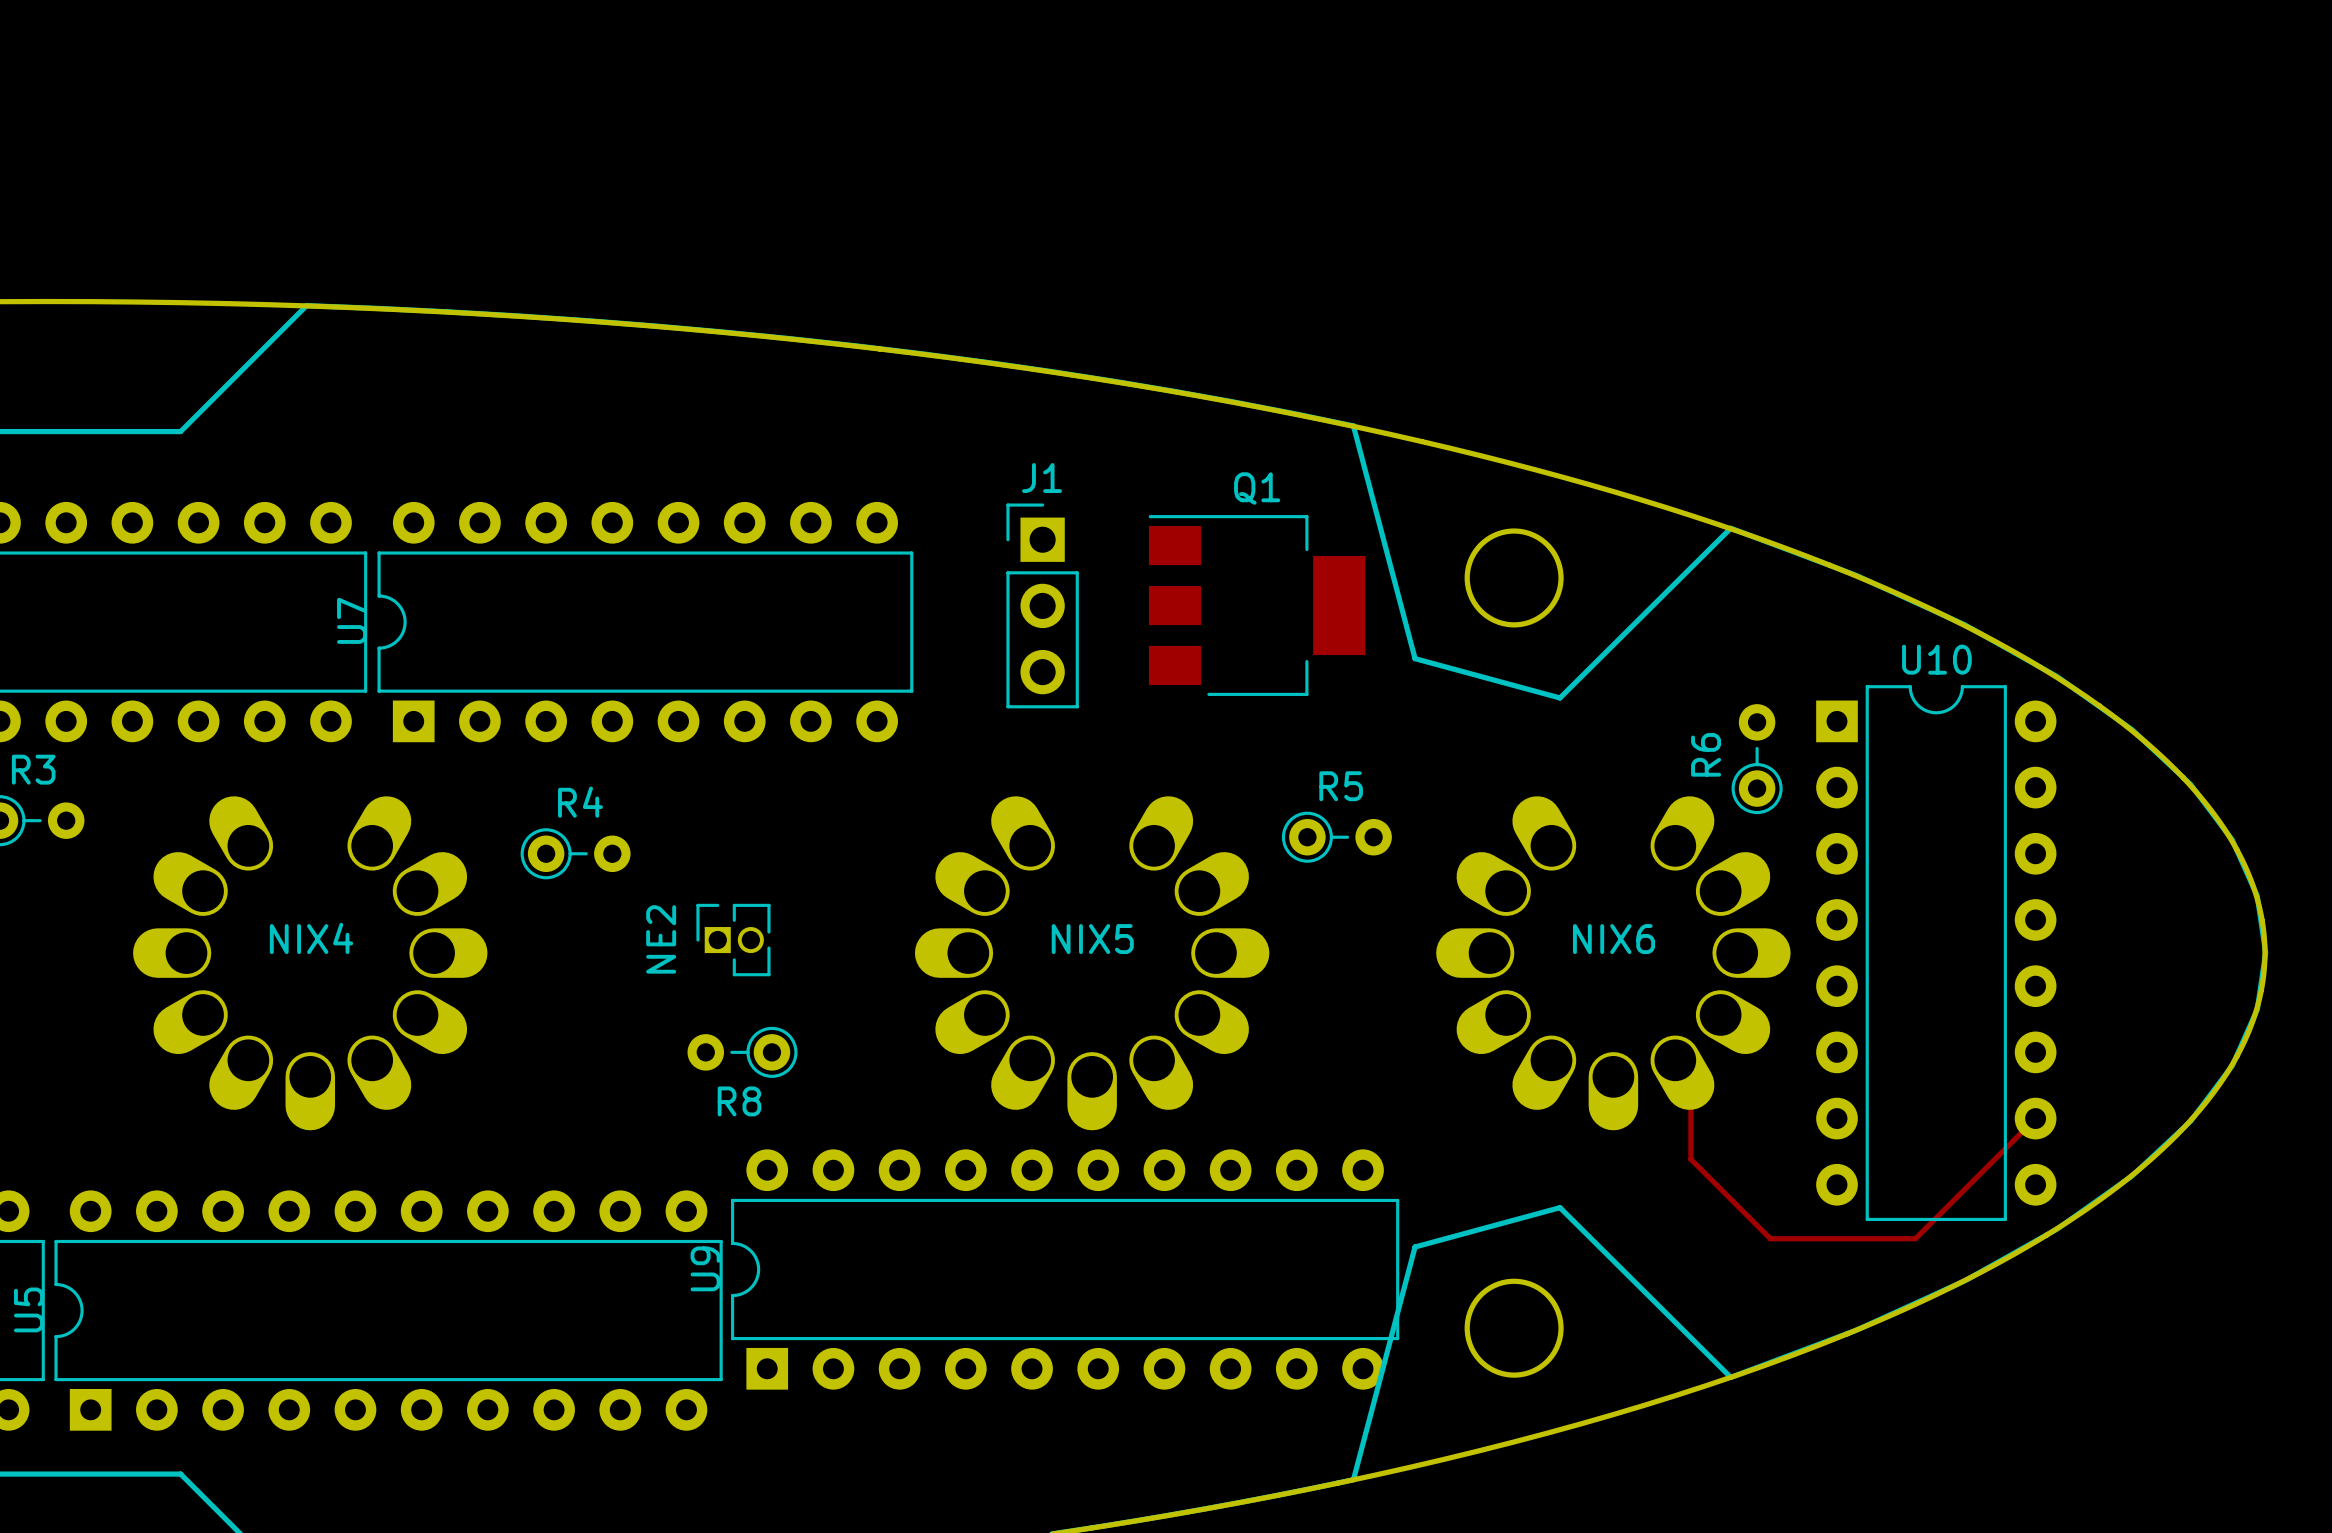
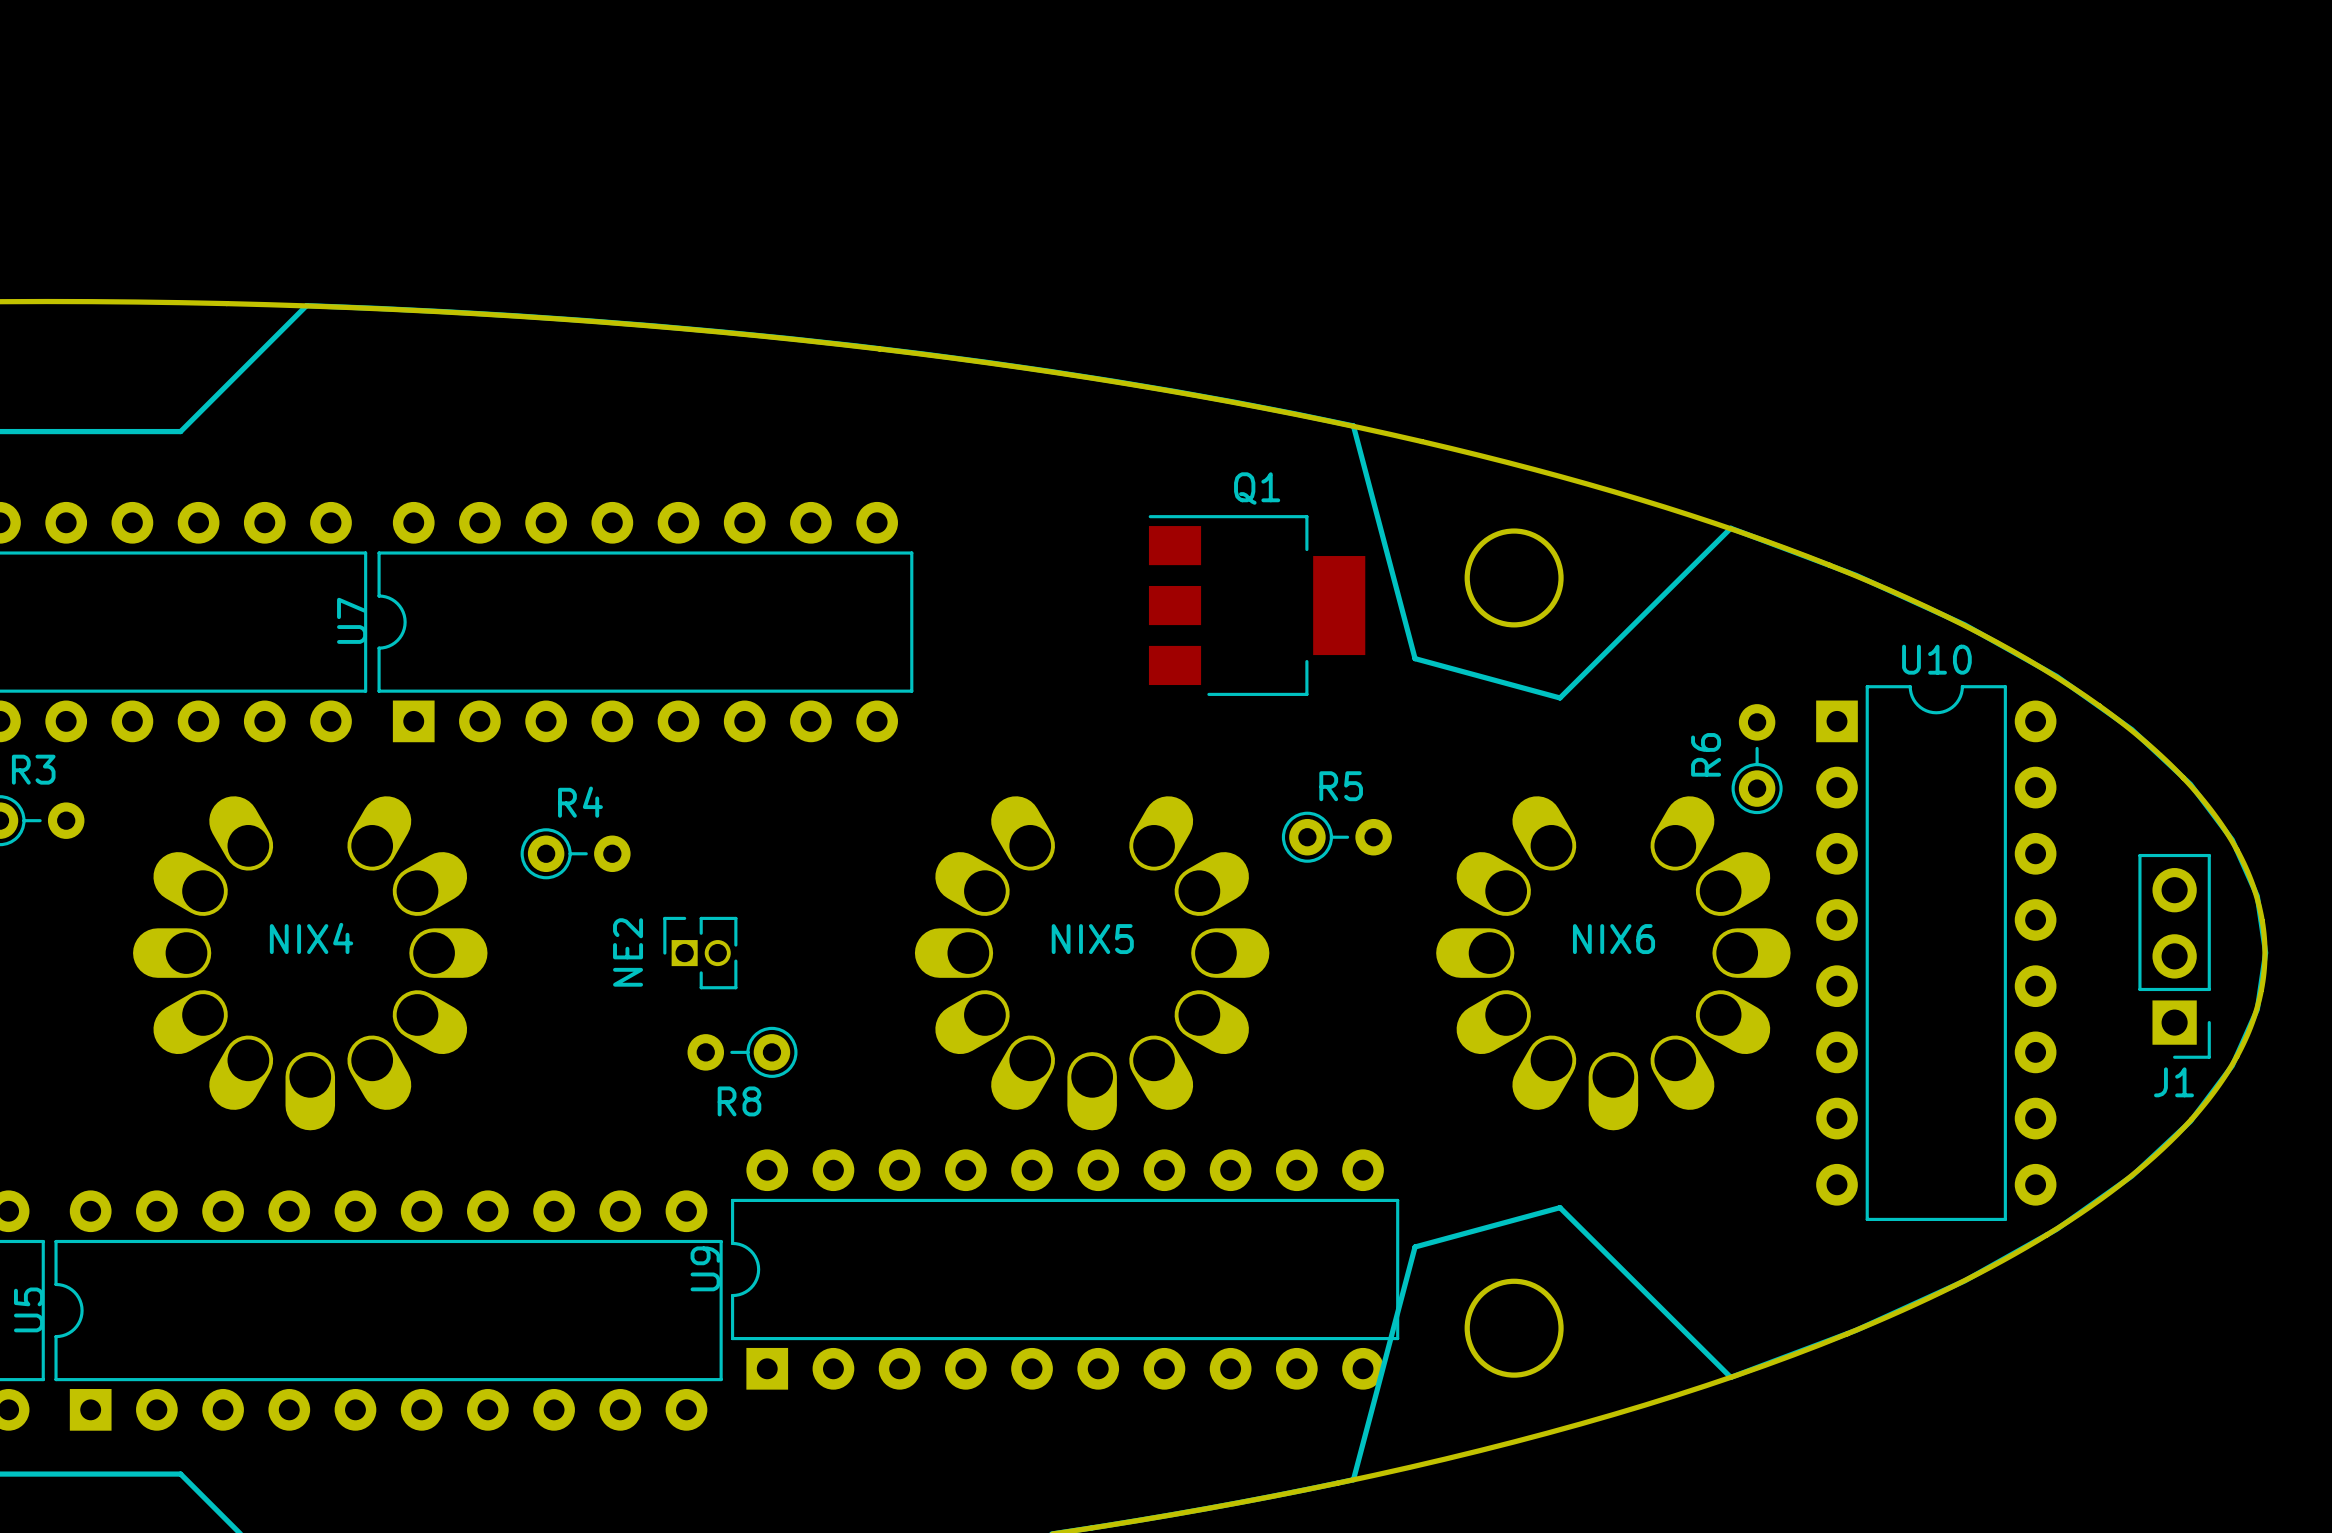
J1 rotation: 0° (1042, 605) -> 180° (2174, 956)
J1 position: (1042, 605) -> (2174, 956)
NE2 position: (733, 940) -> (700, 953)
track: (1690, 1075) (1690, 1159) (1770, 1238) (1915, 1238) (2035, 1118) -> none

